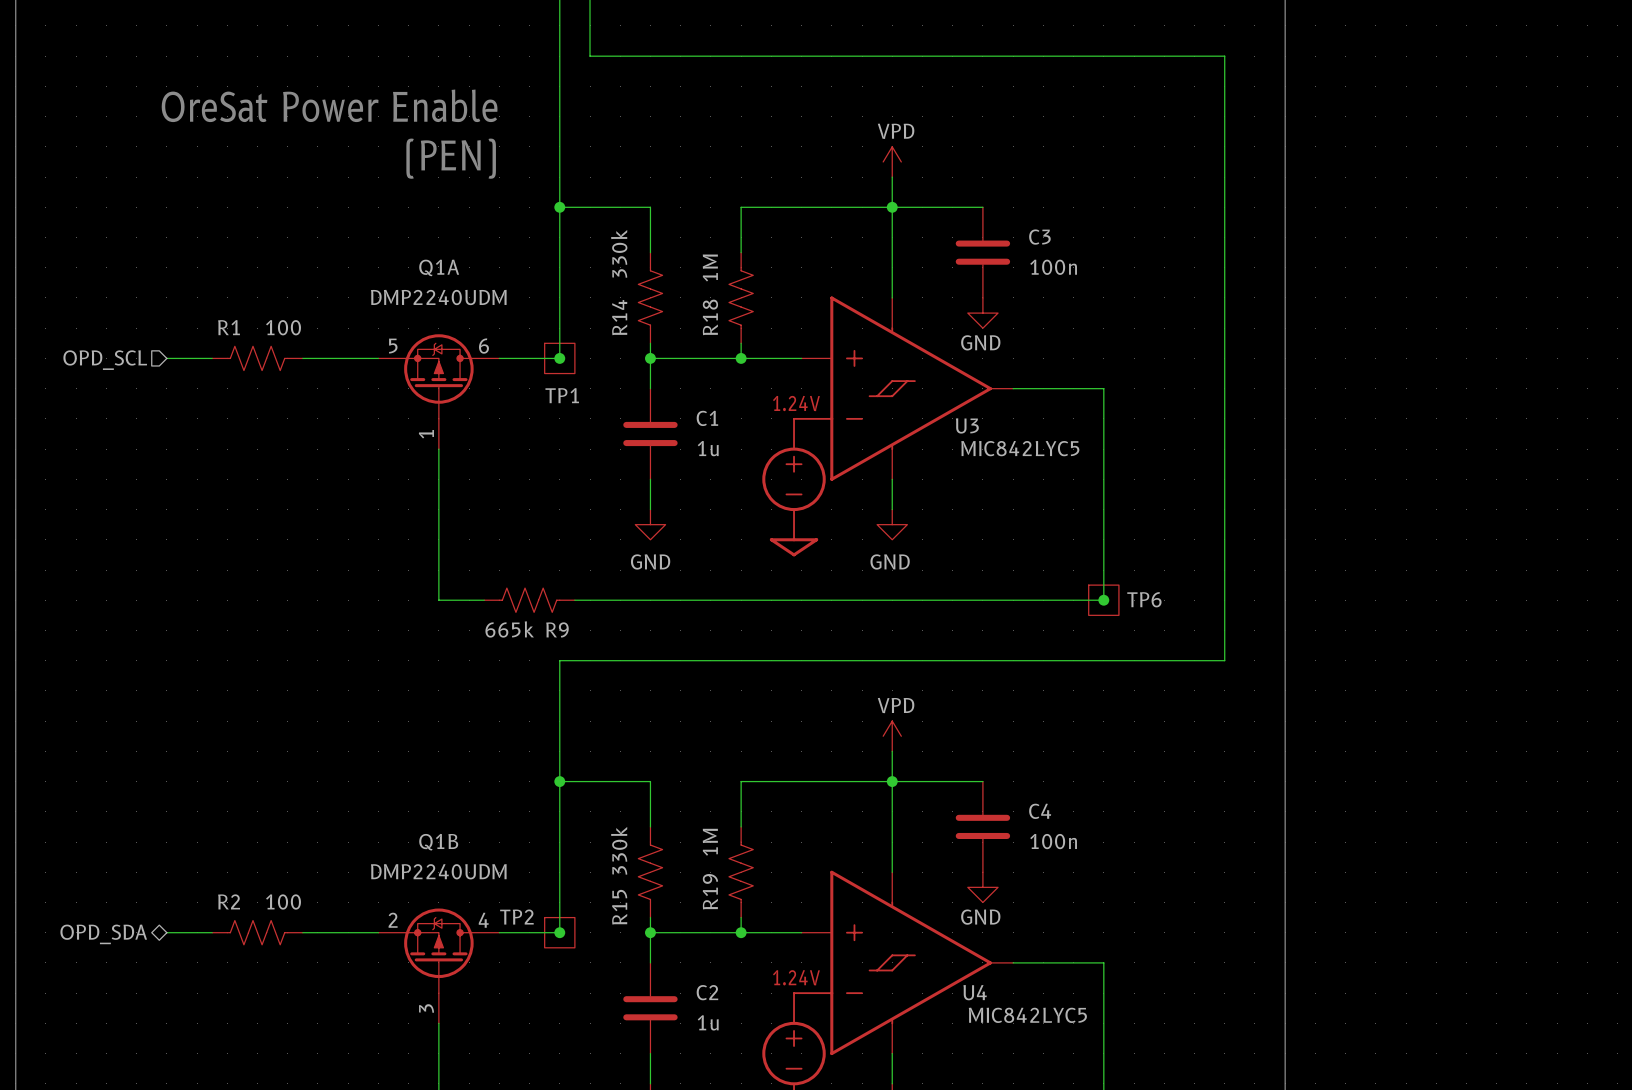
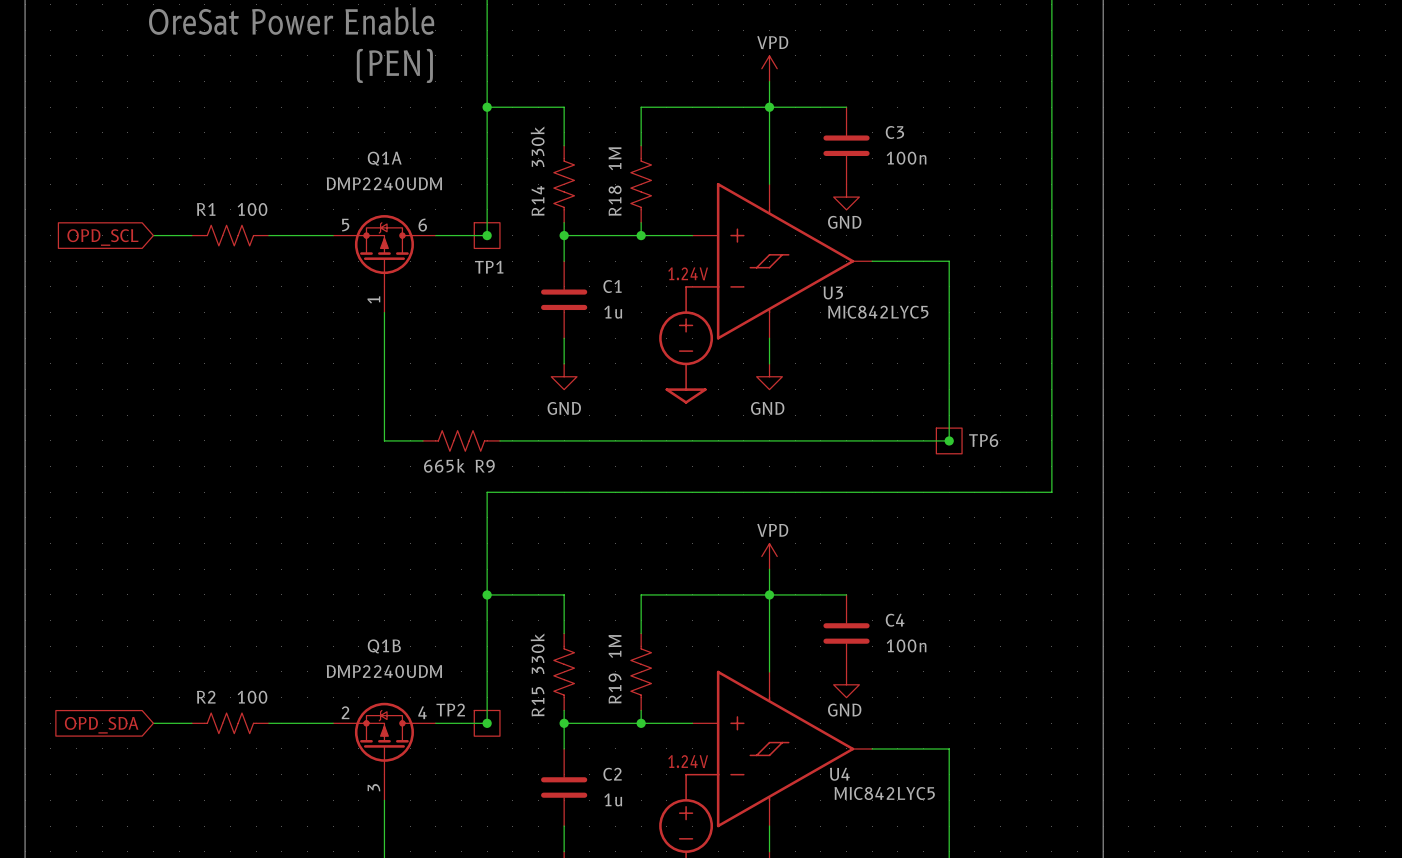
hierarchical label: OPD_SCL (105, 360) -> none
global label: none -> OPD_SCL (102, 237)
hierarchical label: OPD_SDA (103, 934) -> none
global label: none -> OPD_SDA (101, 725)

